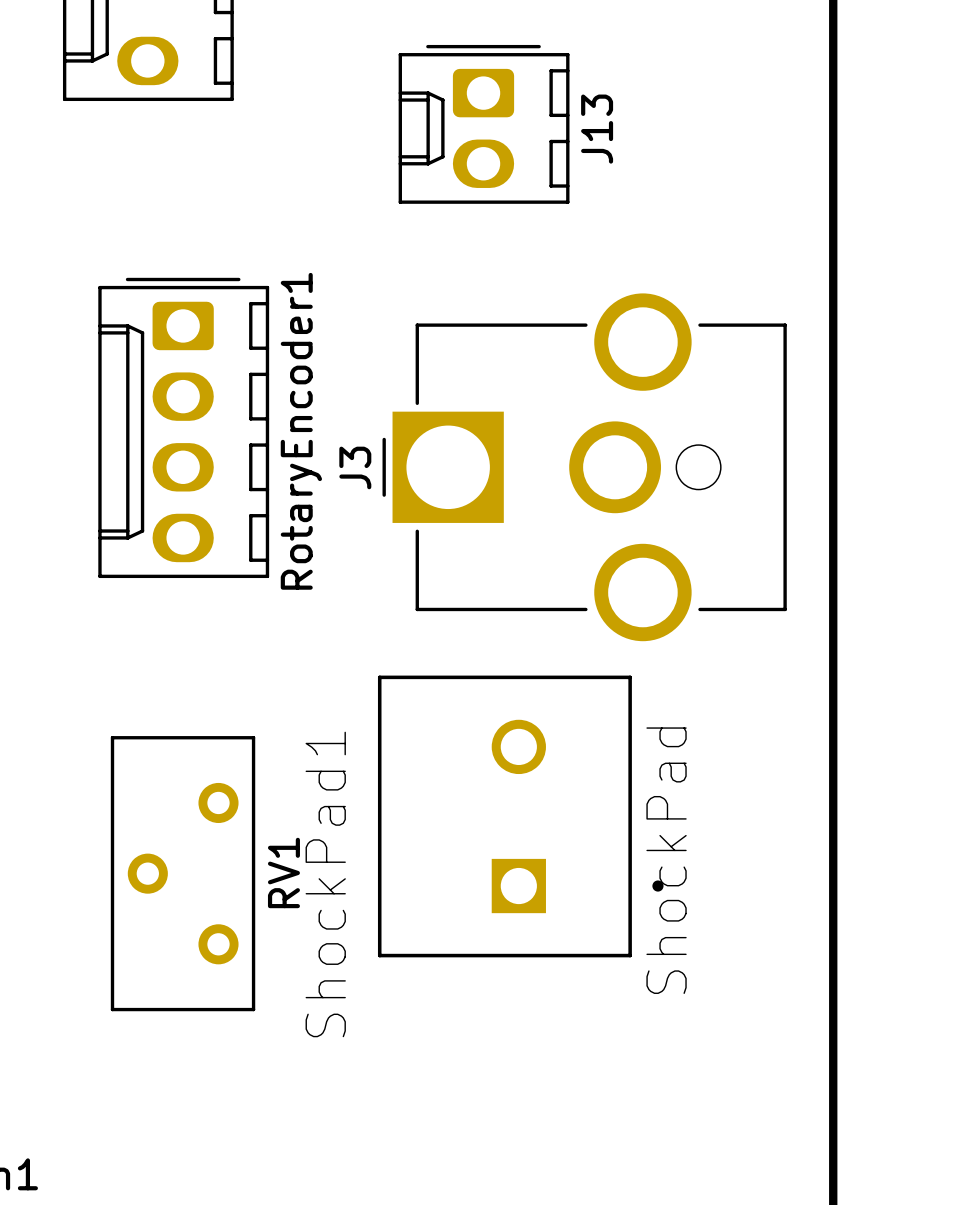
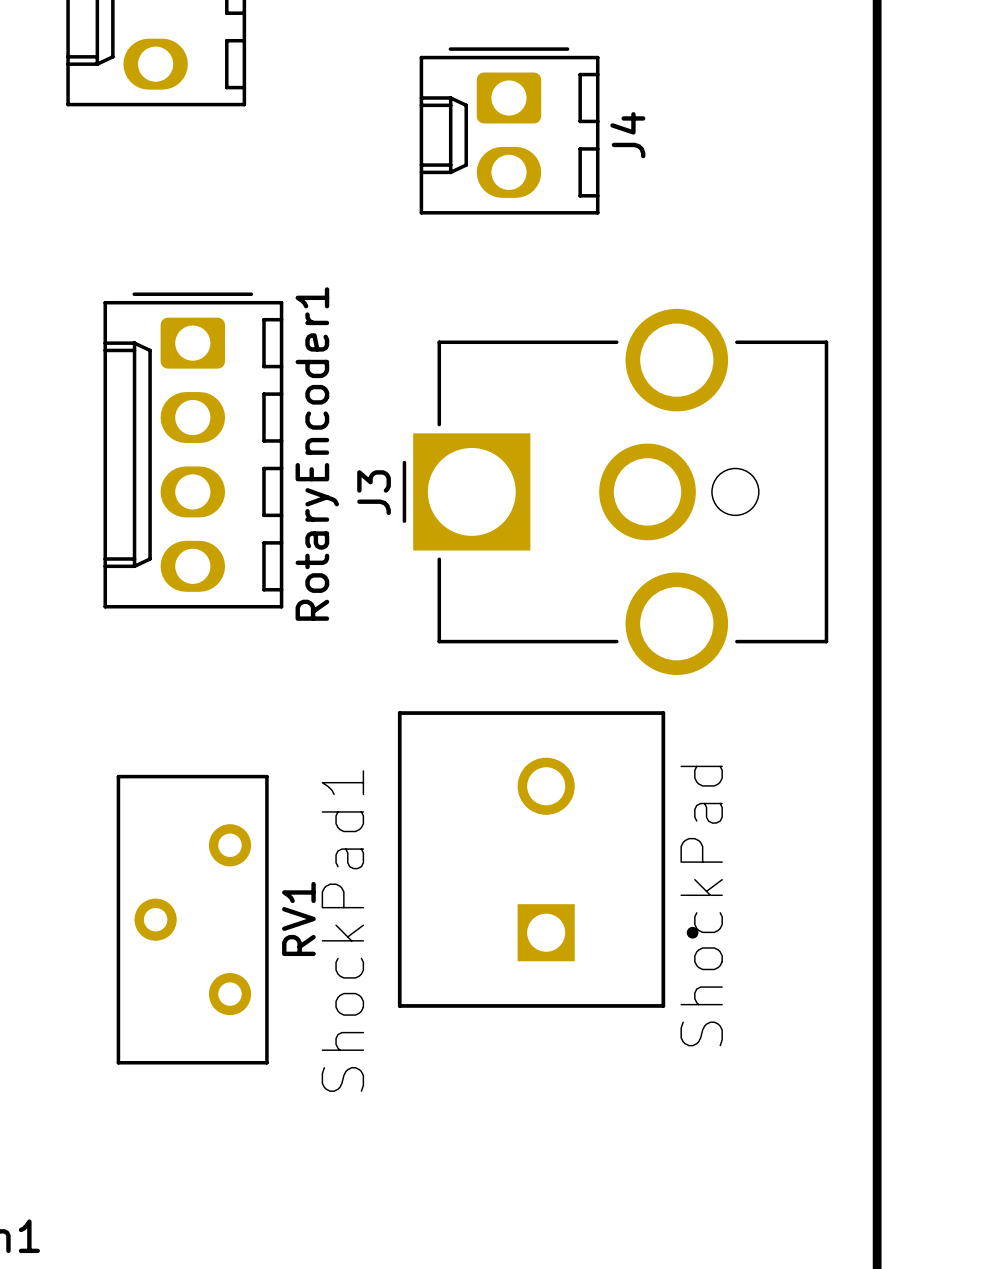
J13 name: J13 (597, 129) -> J4 (627, 135)

